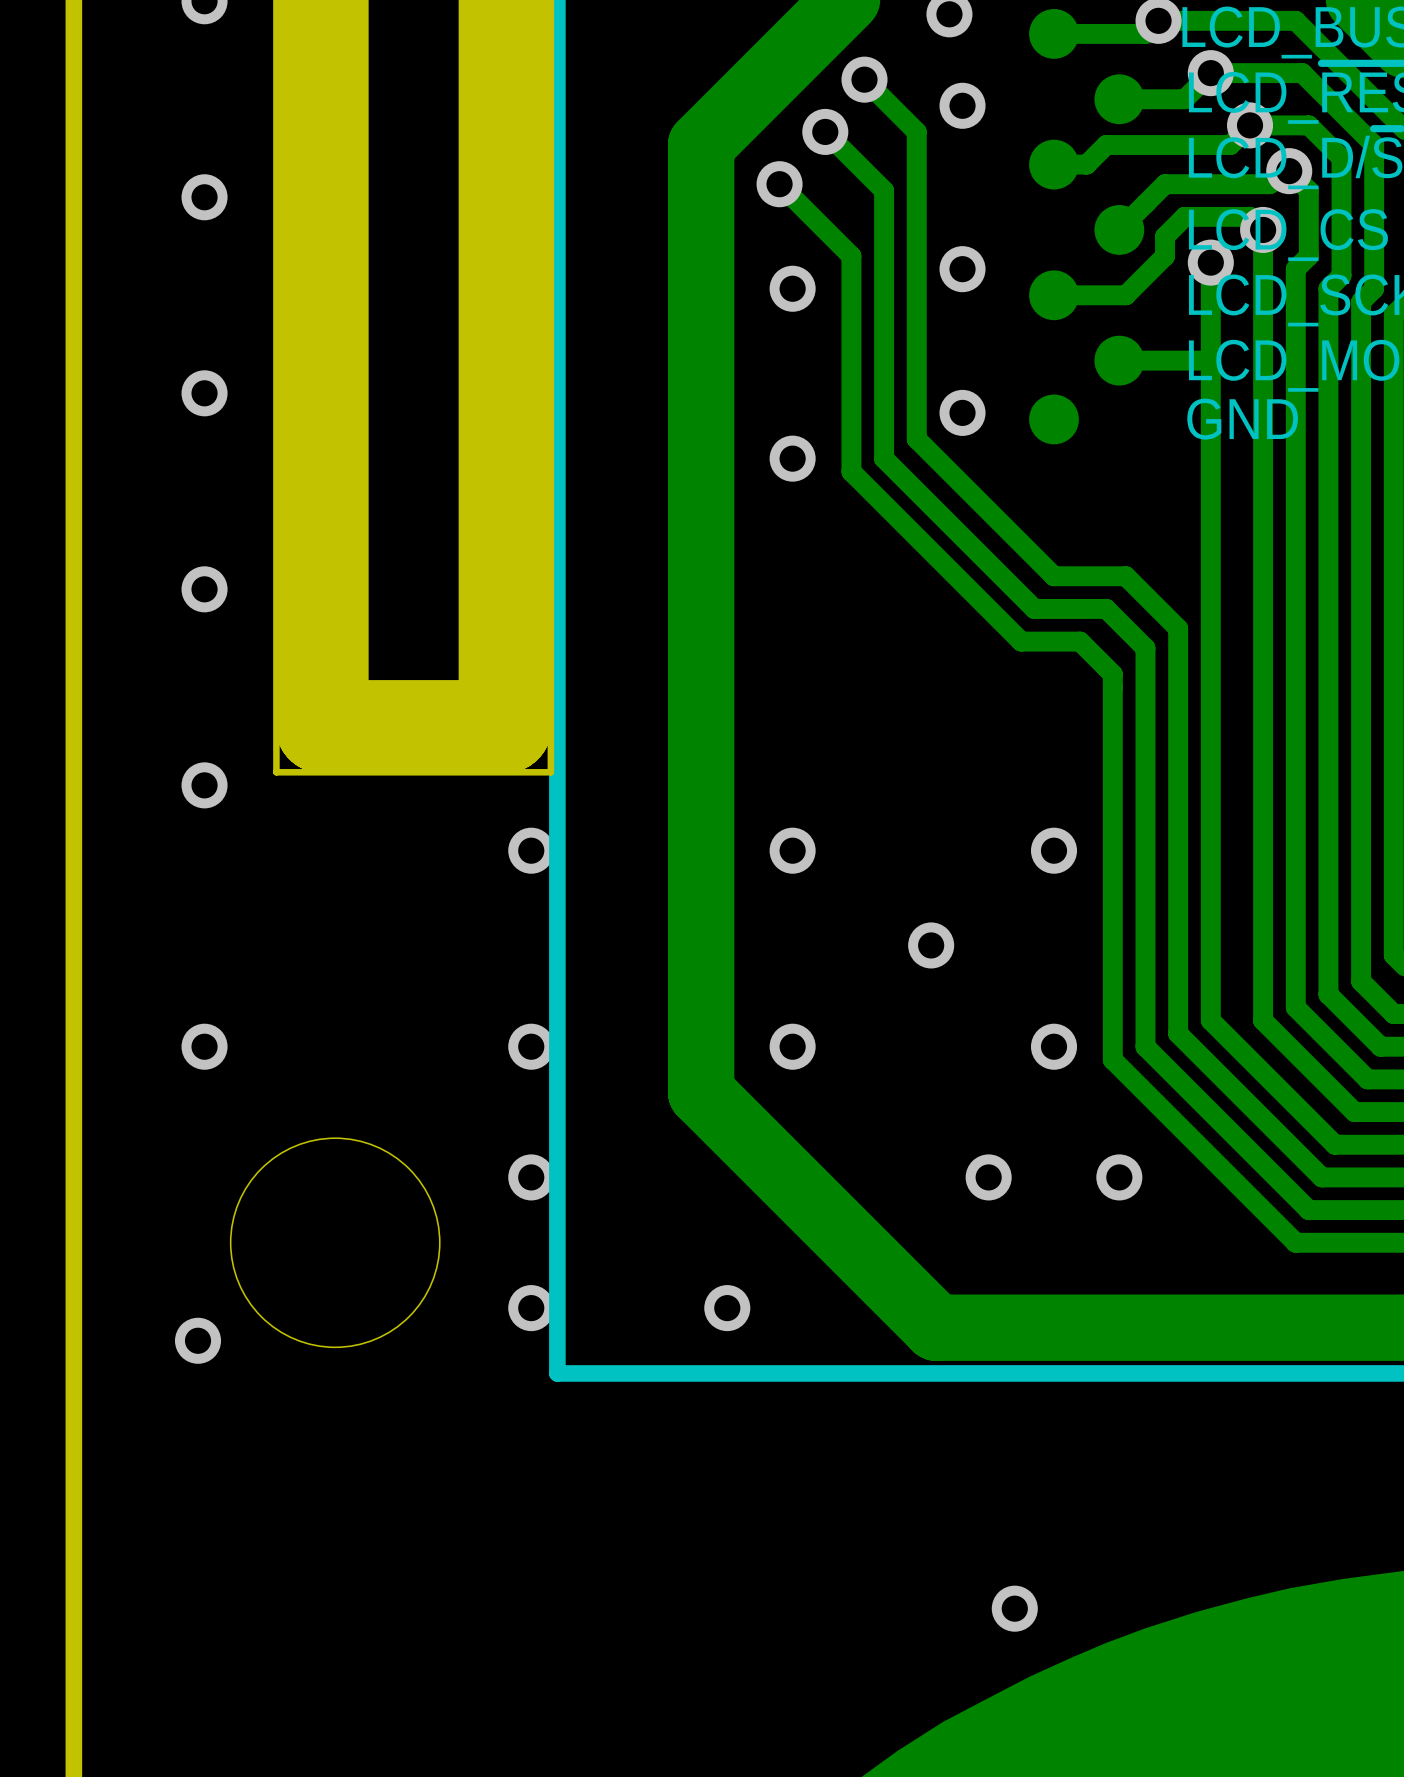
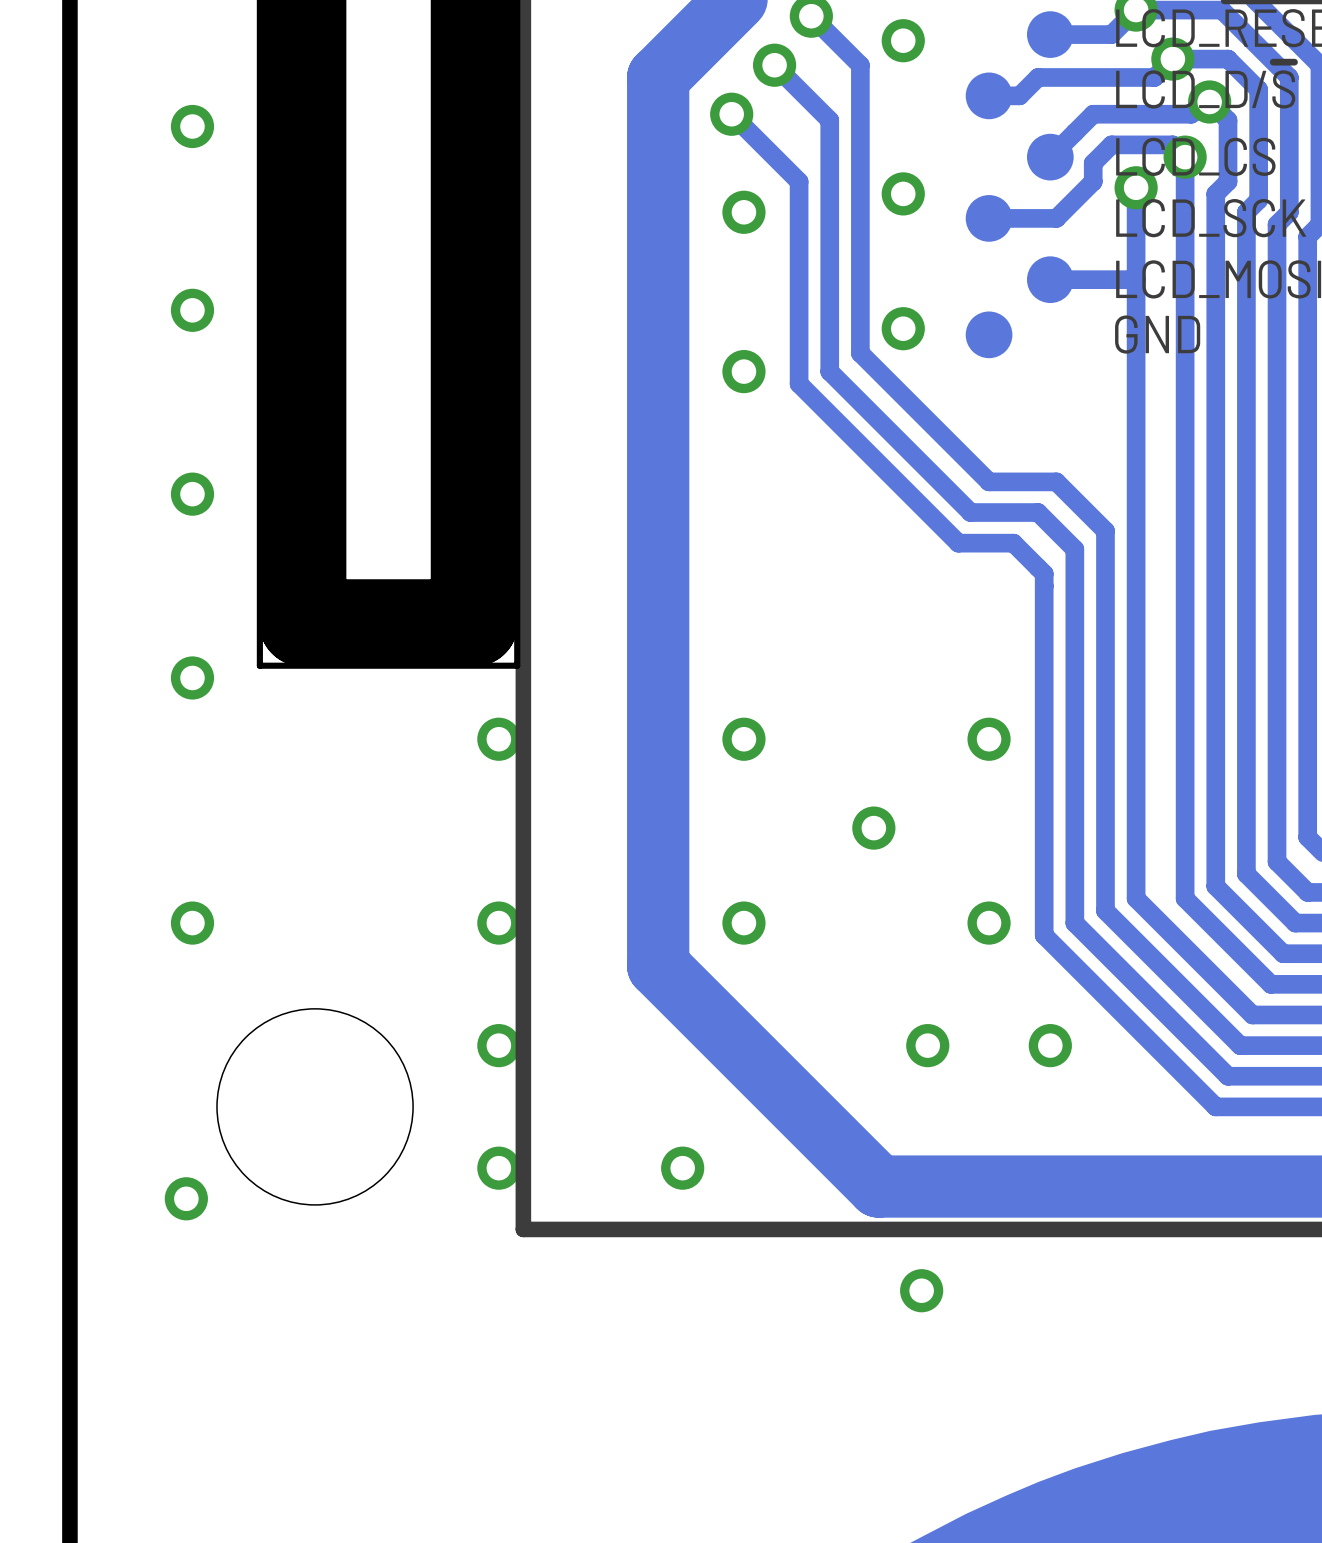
via position: (1014, 1608) -> (921, 1290)

